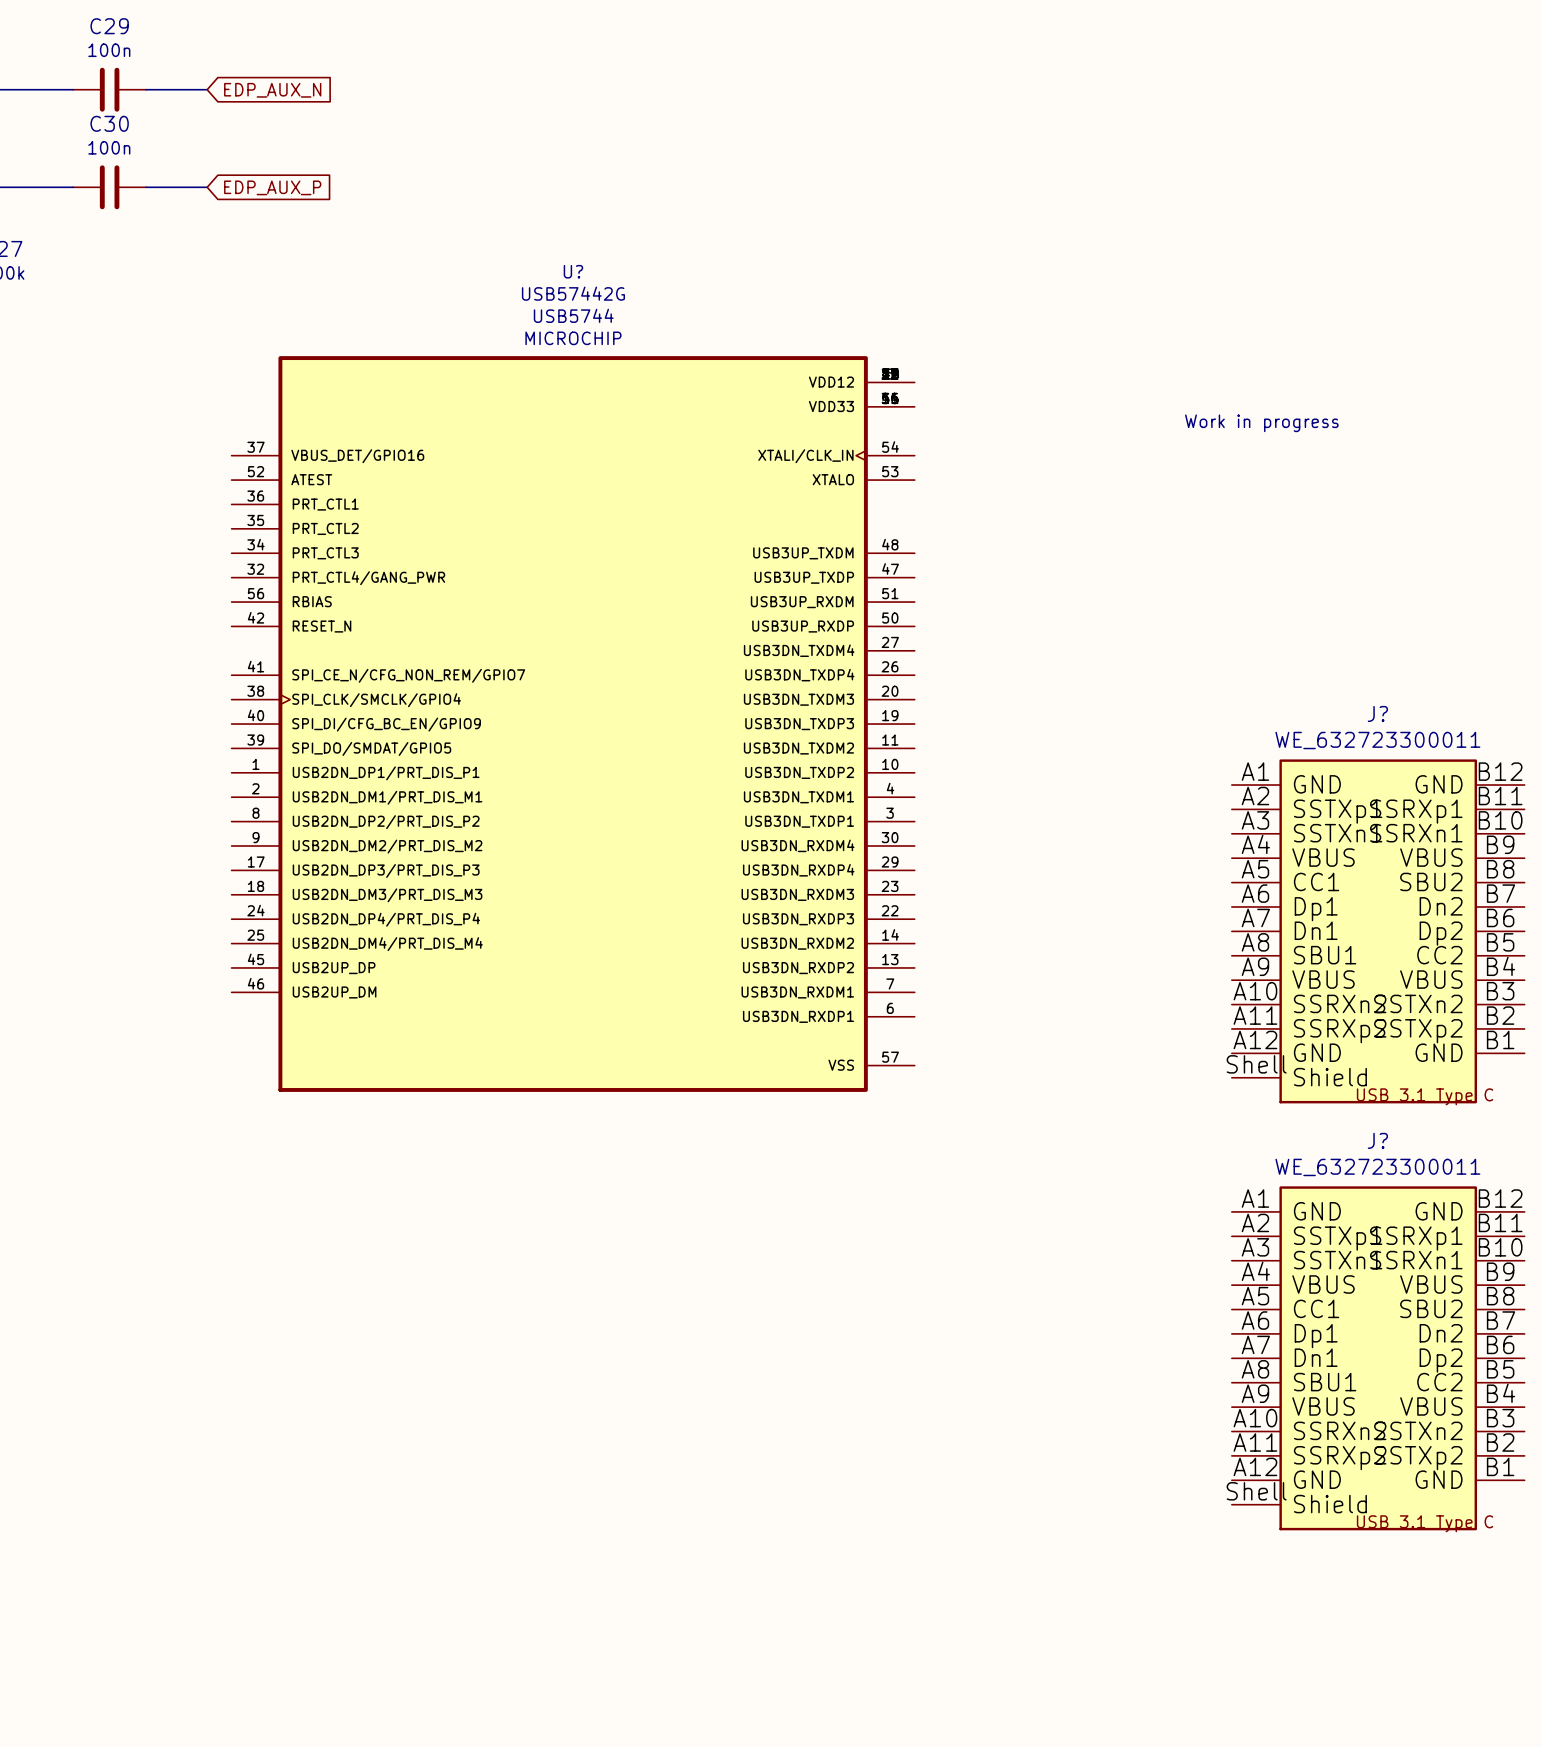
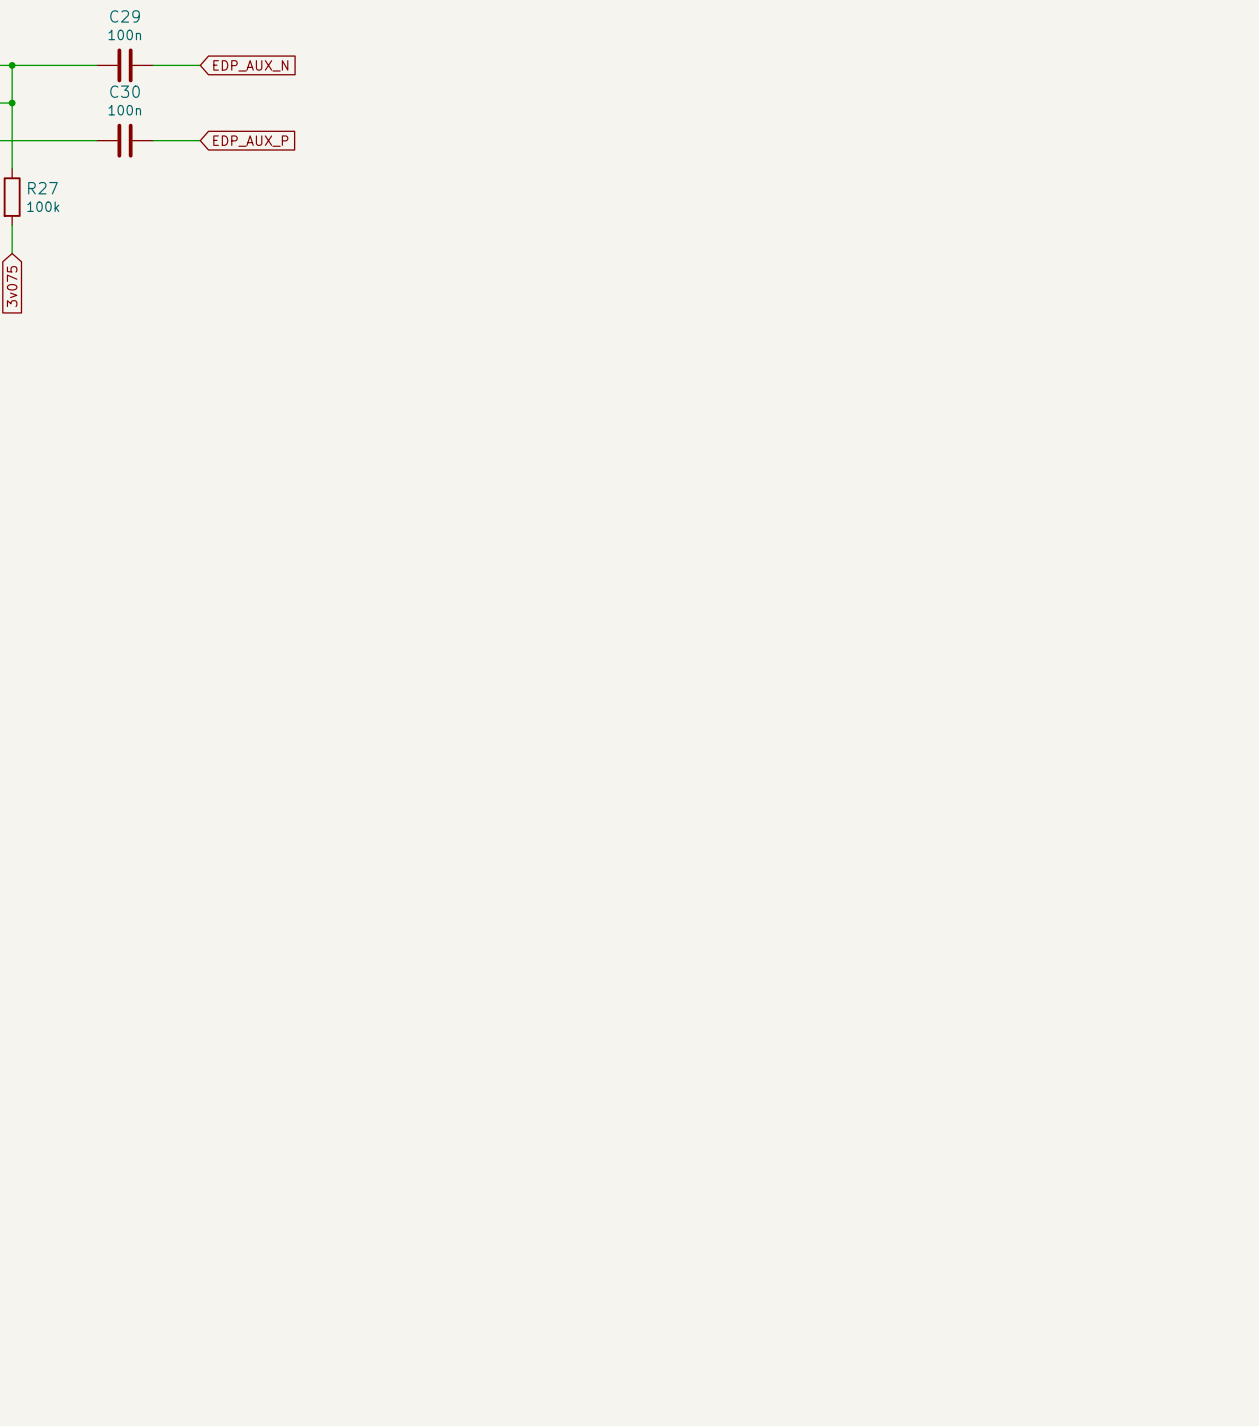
text: Work in progress (1261, 423) -> none
U?: USB57442G (573, 724) -> none
J?: WE_632723300011 (1378, 931) -> none
J?: WE_632723300011 (1378, 1358) -> none

